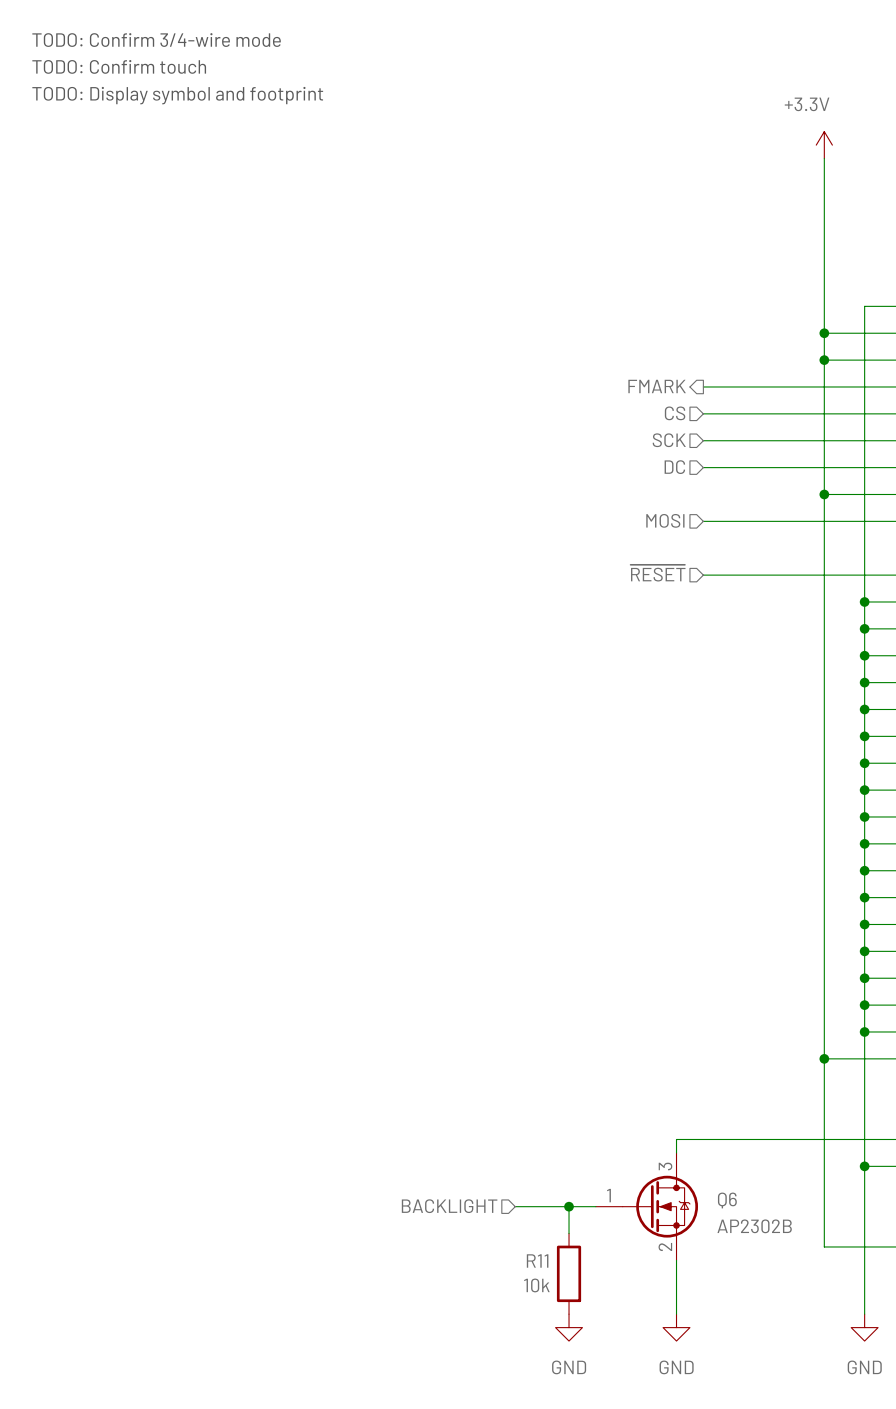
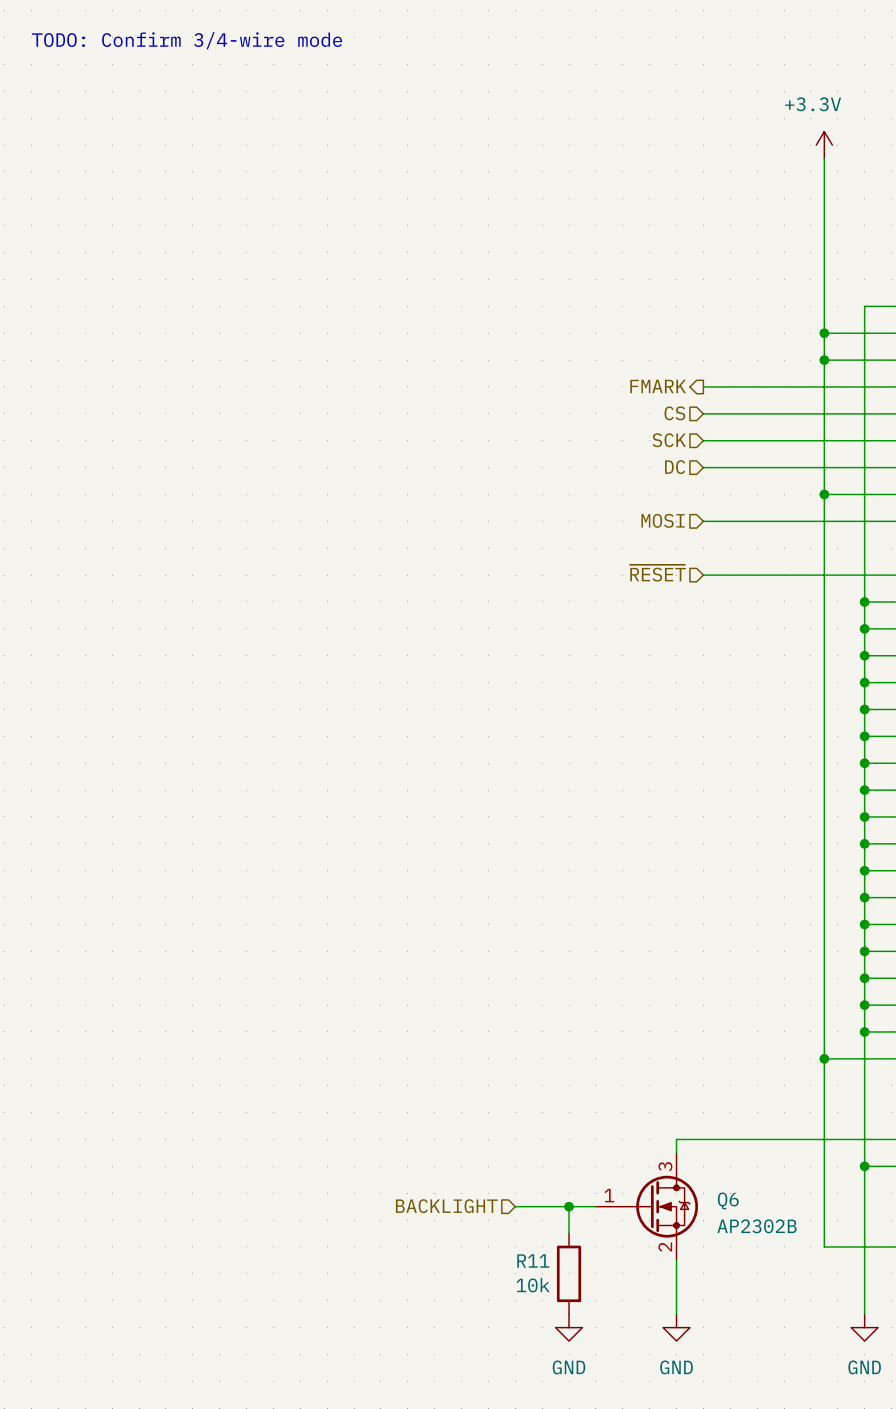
text: TODO: Confirm touch (119, 66) -> none
text: TODO: Display symbol and footprint (177, 95) -> none

